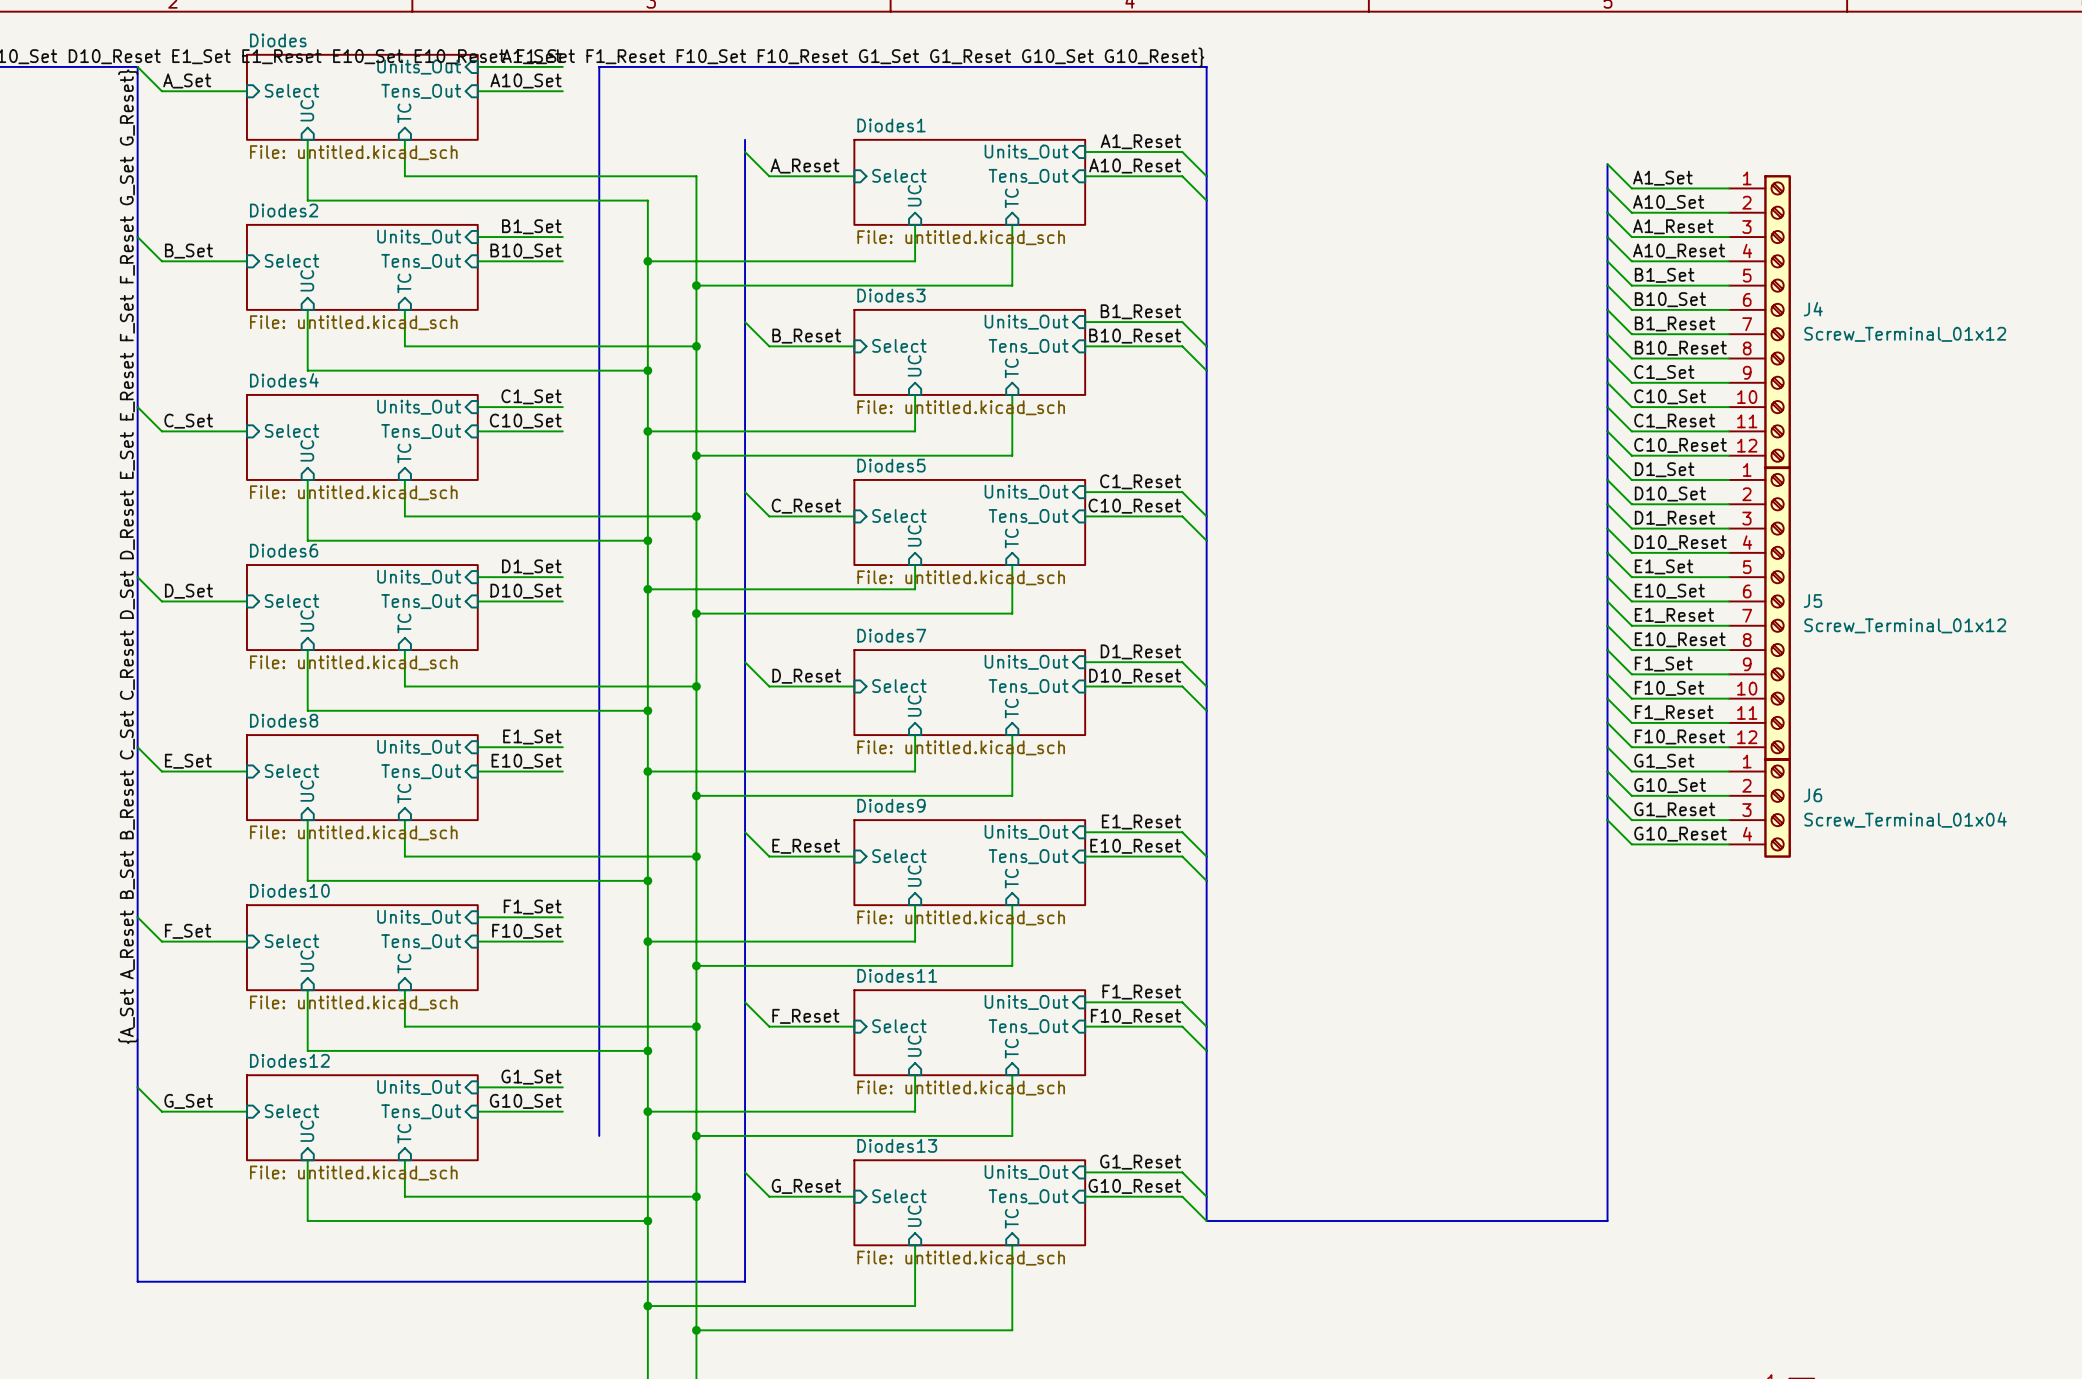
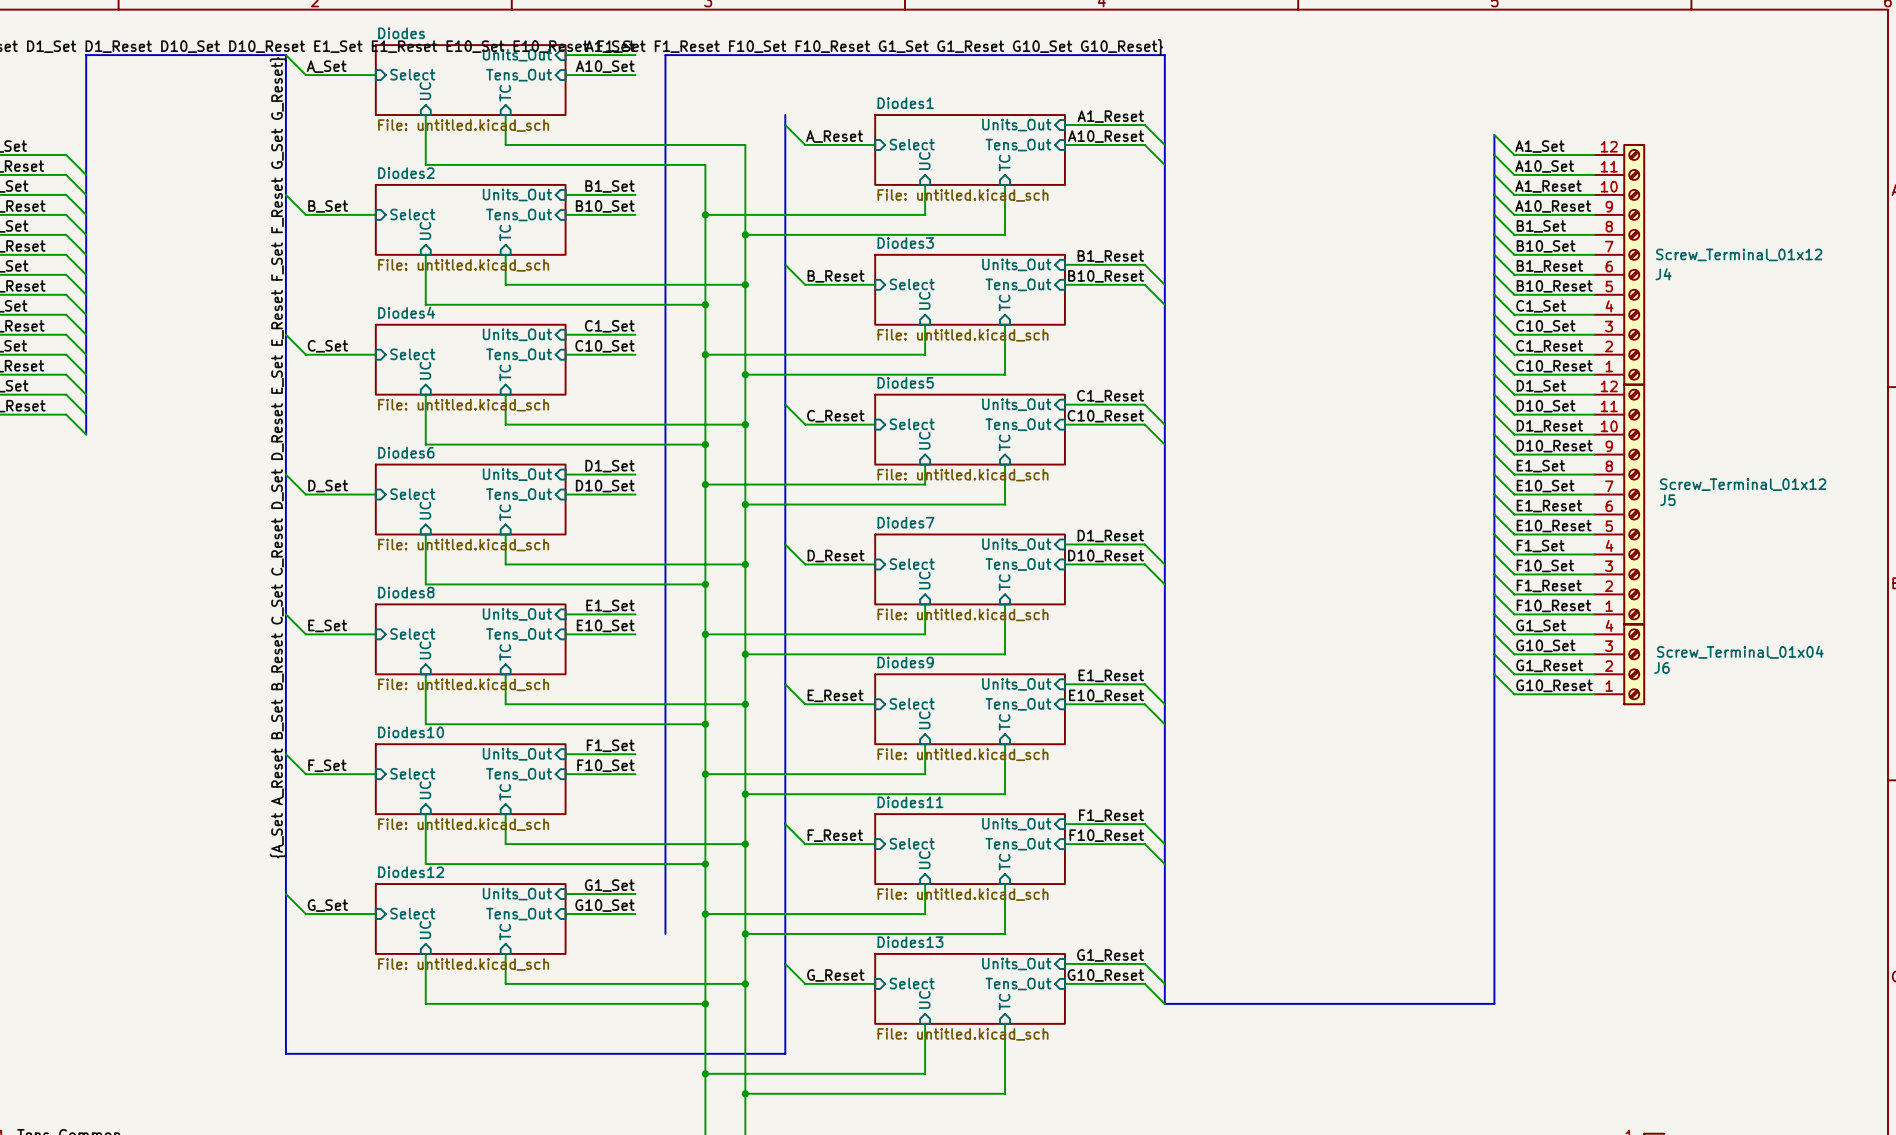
J4 flip: as is (1777, 322) -> up-down (1634, 264)
J5 flip: as is (1777, 613) -> up-down (1634, 504)
J6 flip: as is (1777, 807) -> up-down (1634, 664)

